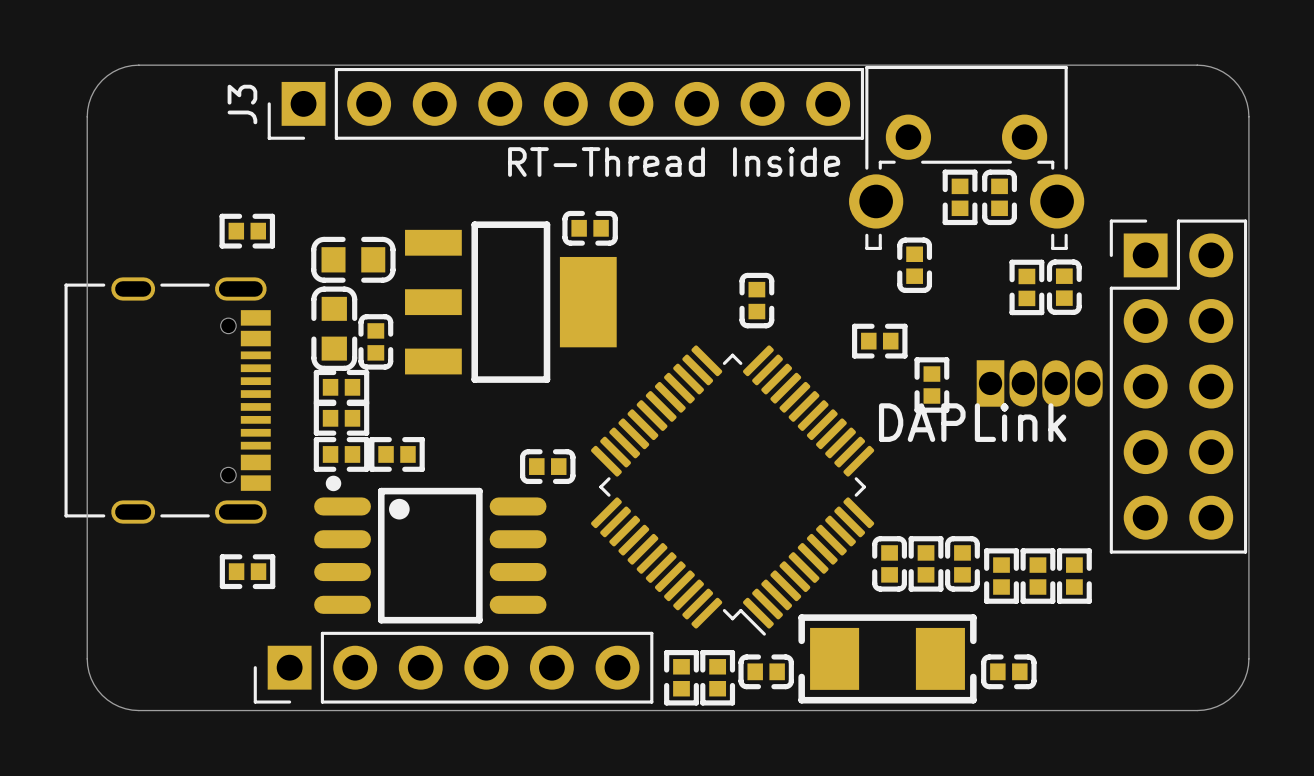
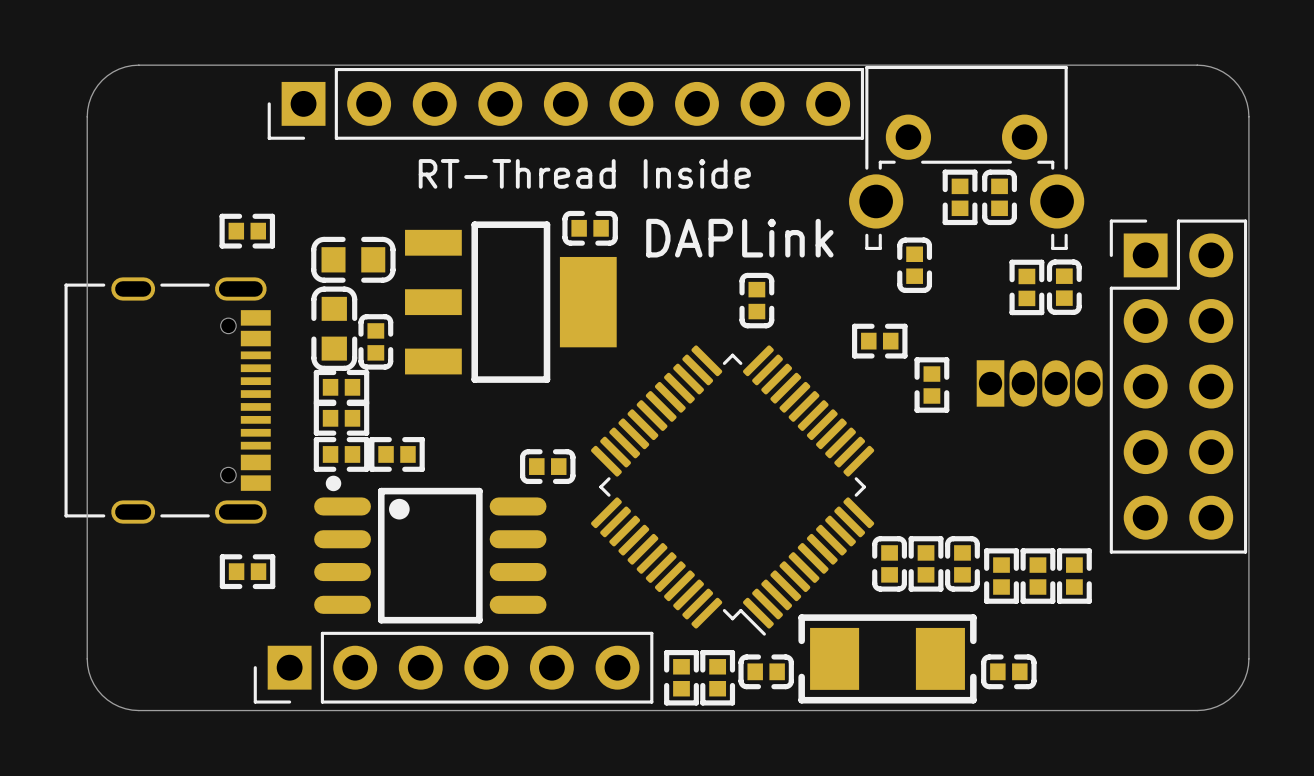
J3 name: J3 (242, 104) -> none
text position: RT-Thread Inside (674, 162) -> RT-Thread Inside (584, 173)
text position: DAPLink (972, 422) -> DAPLink (739, 238)

